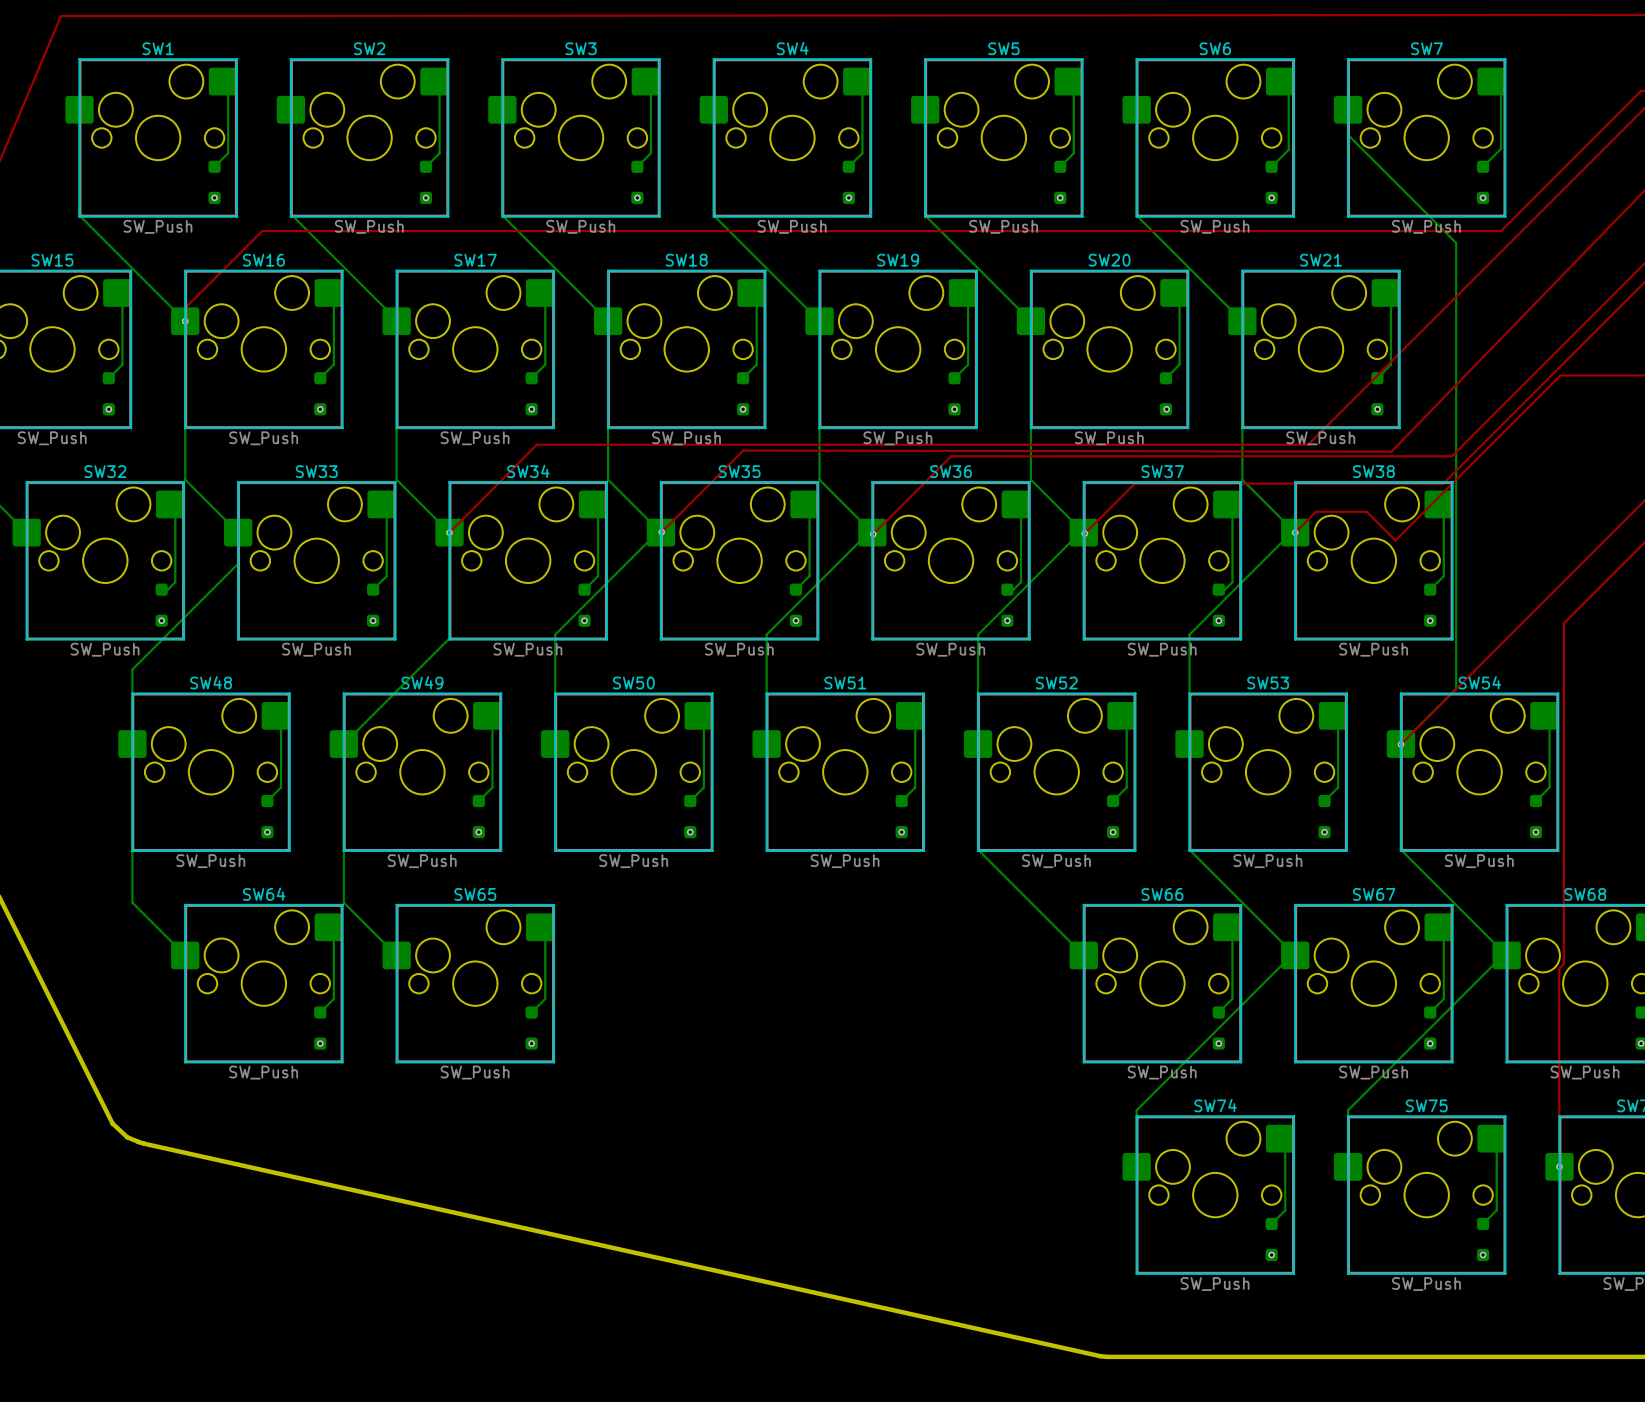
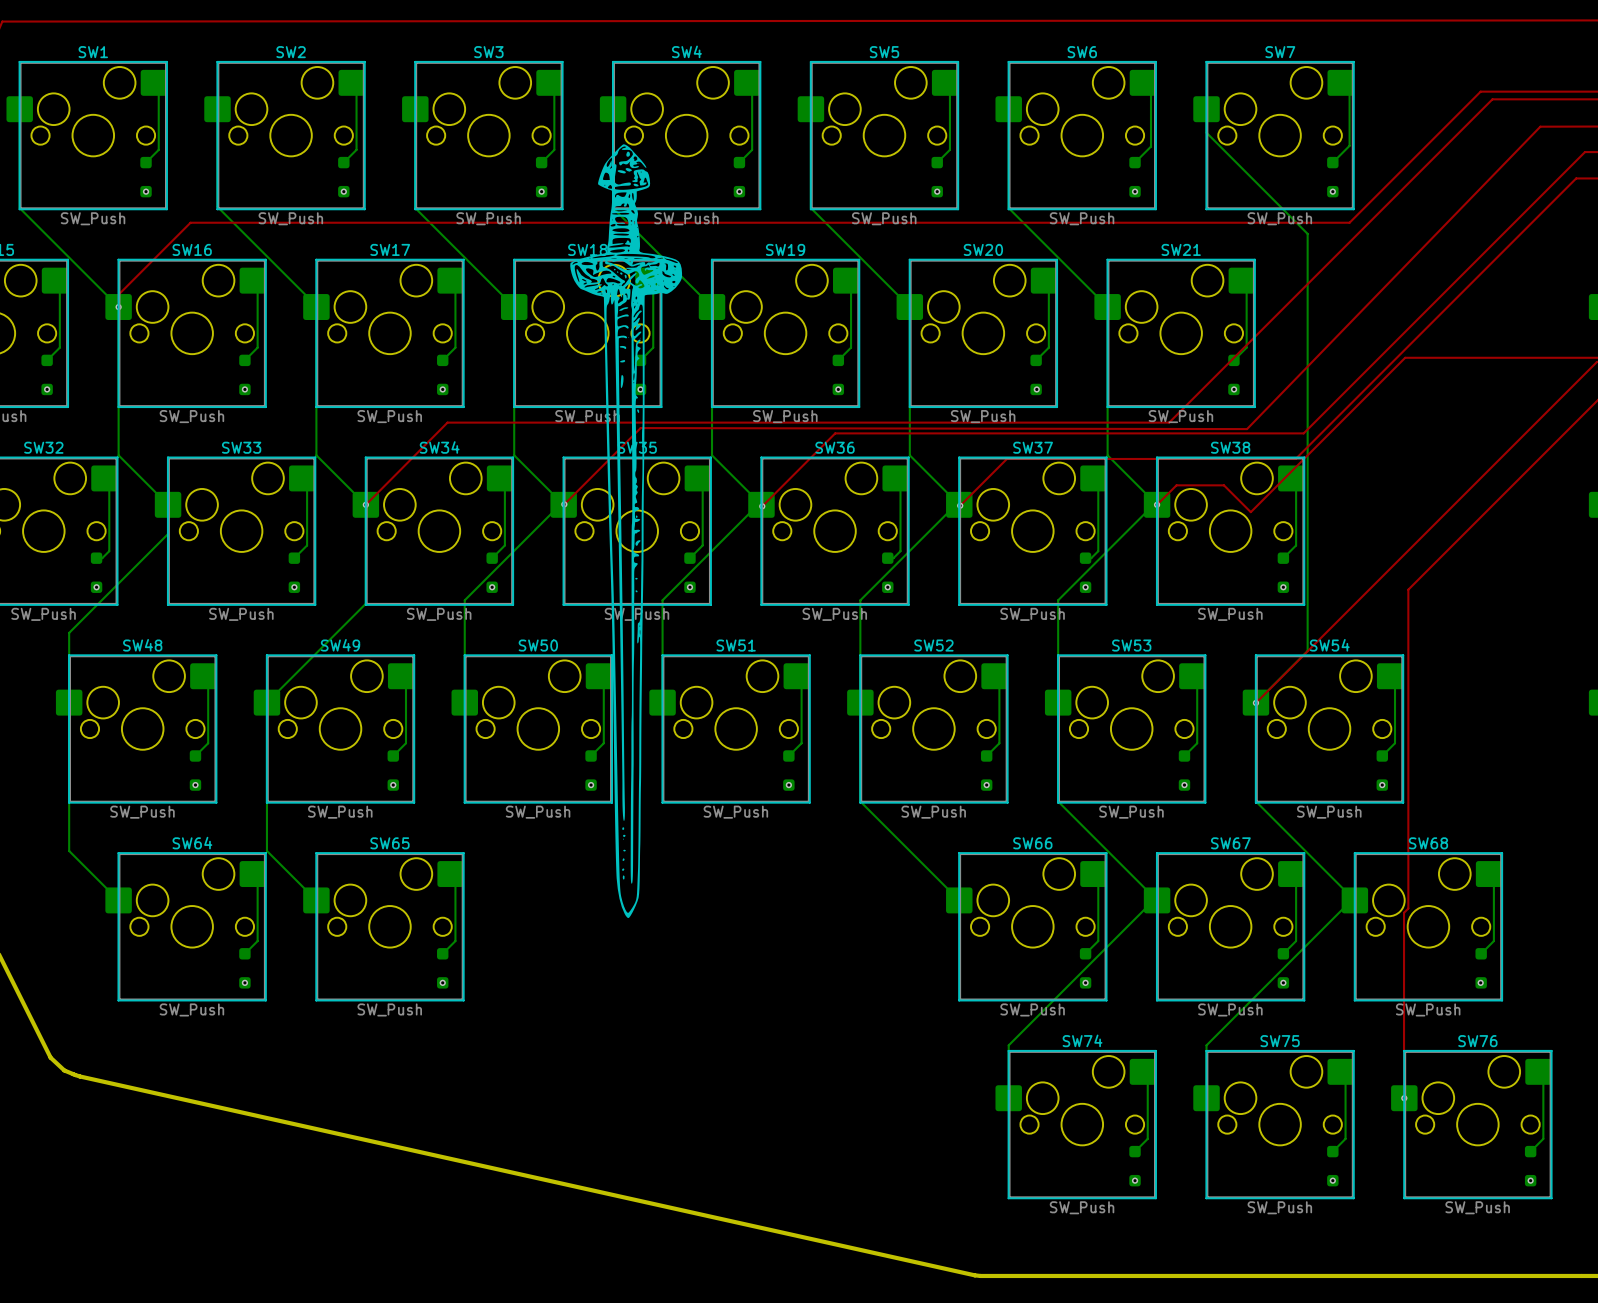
drawing: none -> [570, 144, 683, 919]

